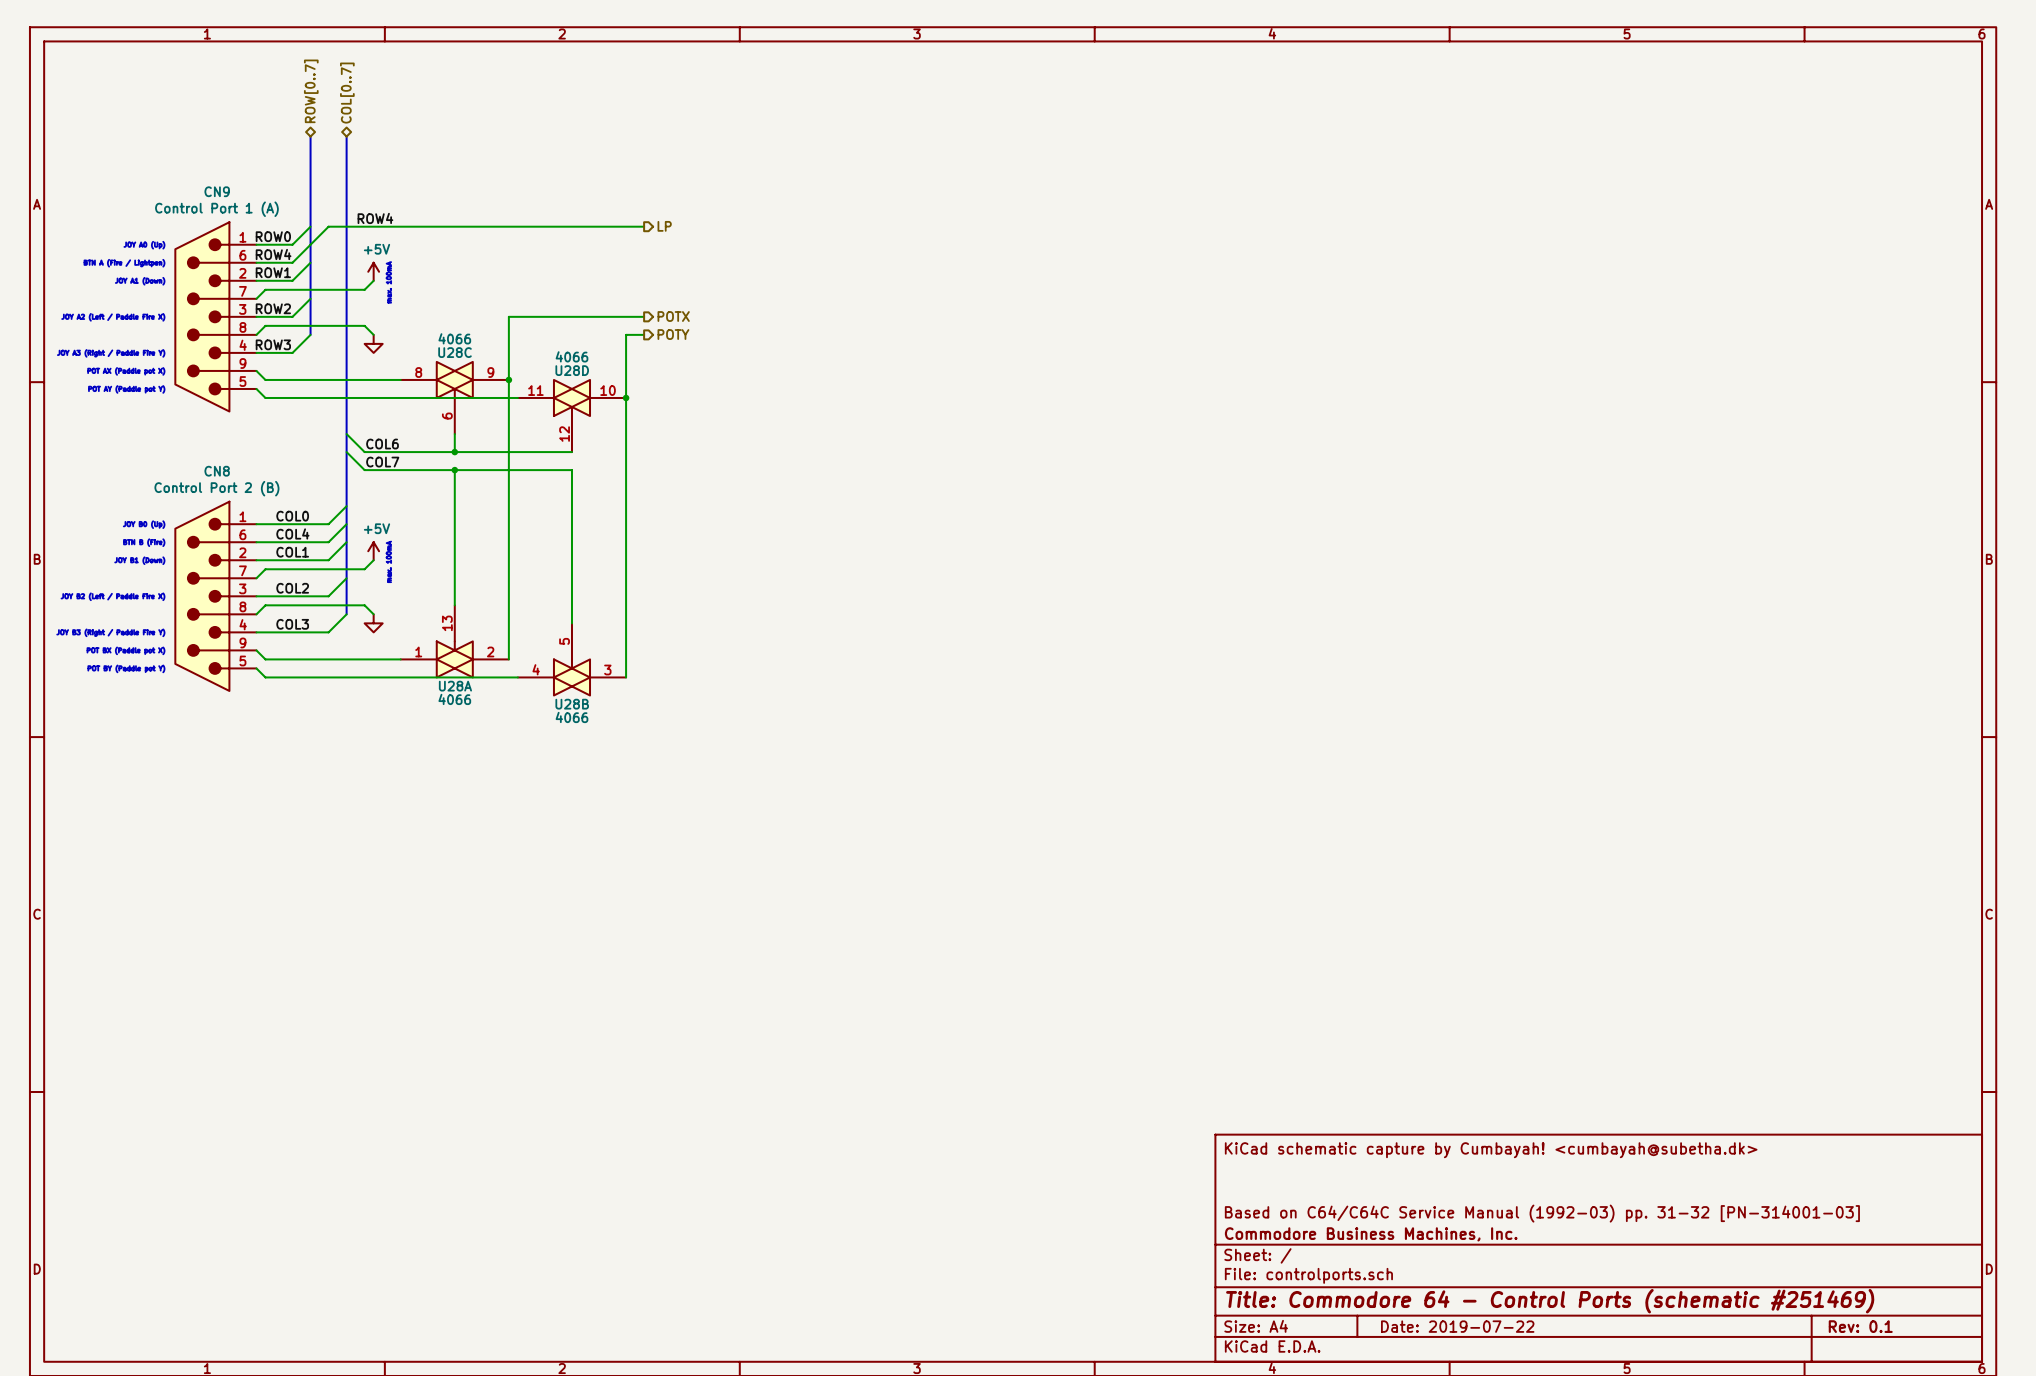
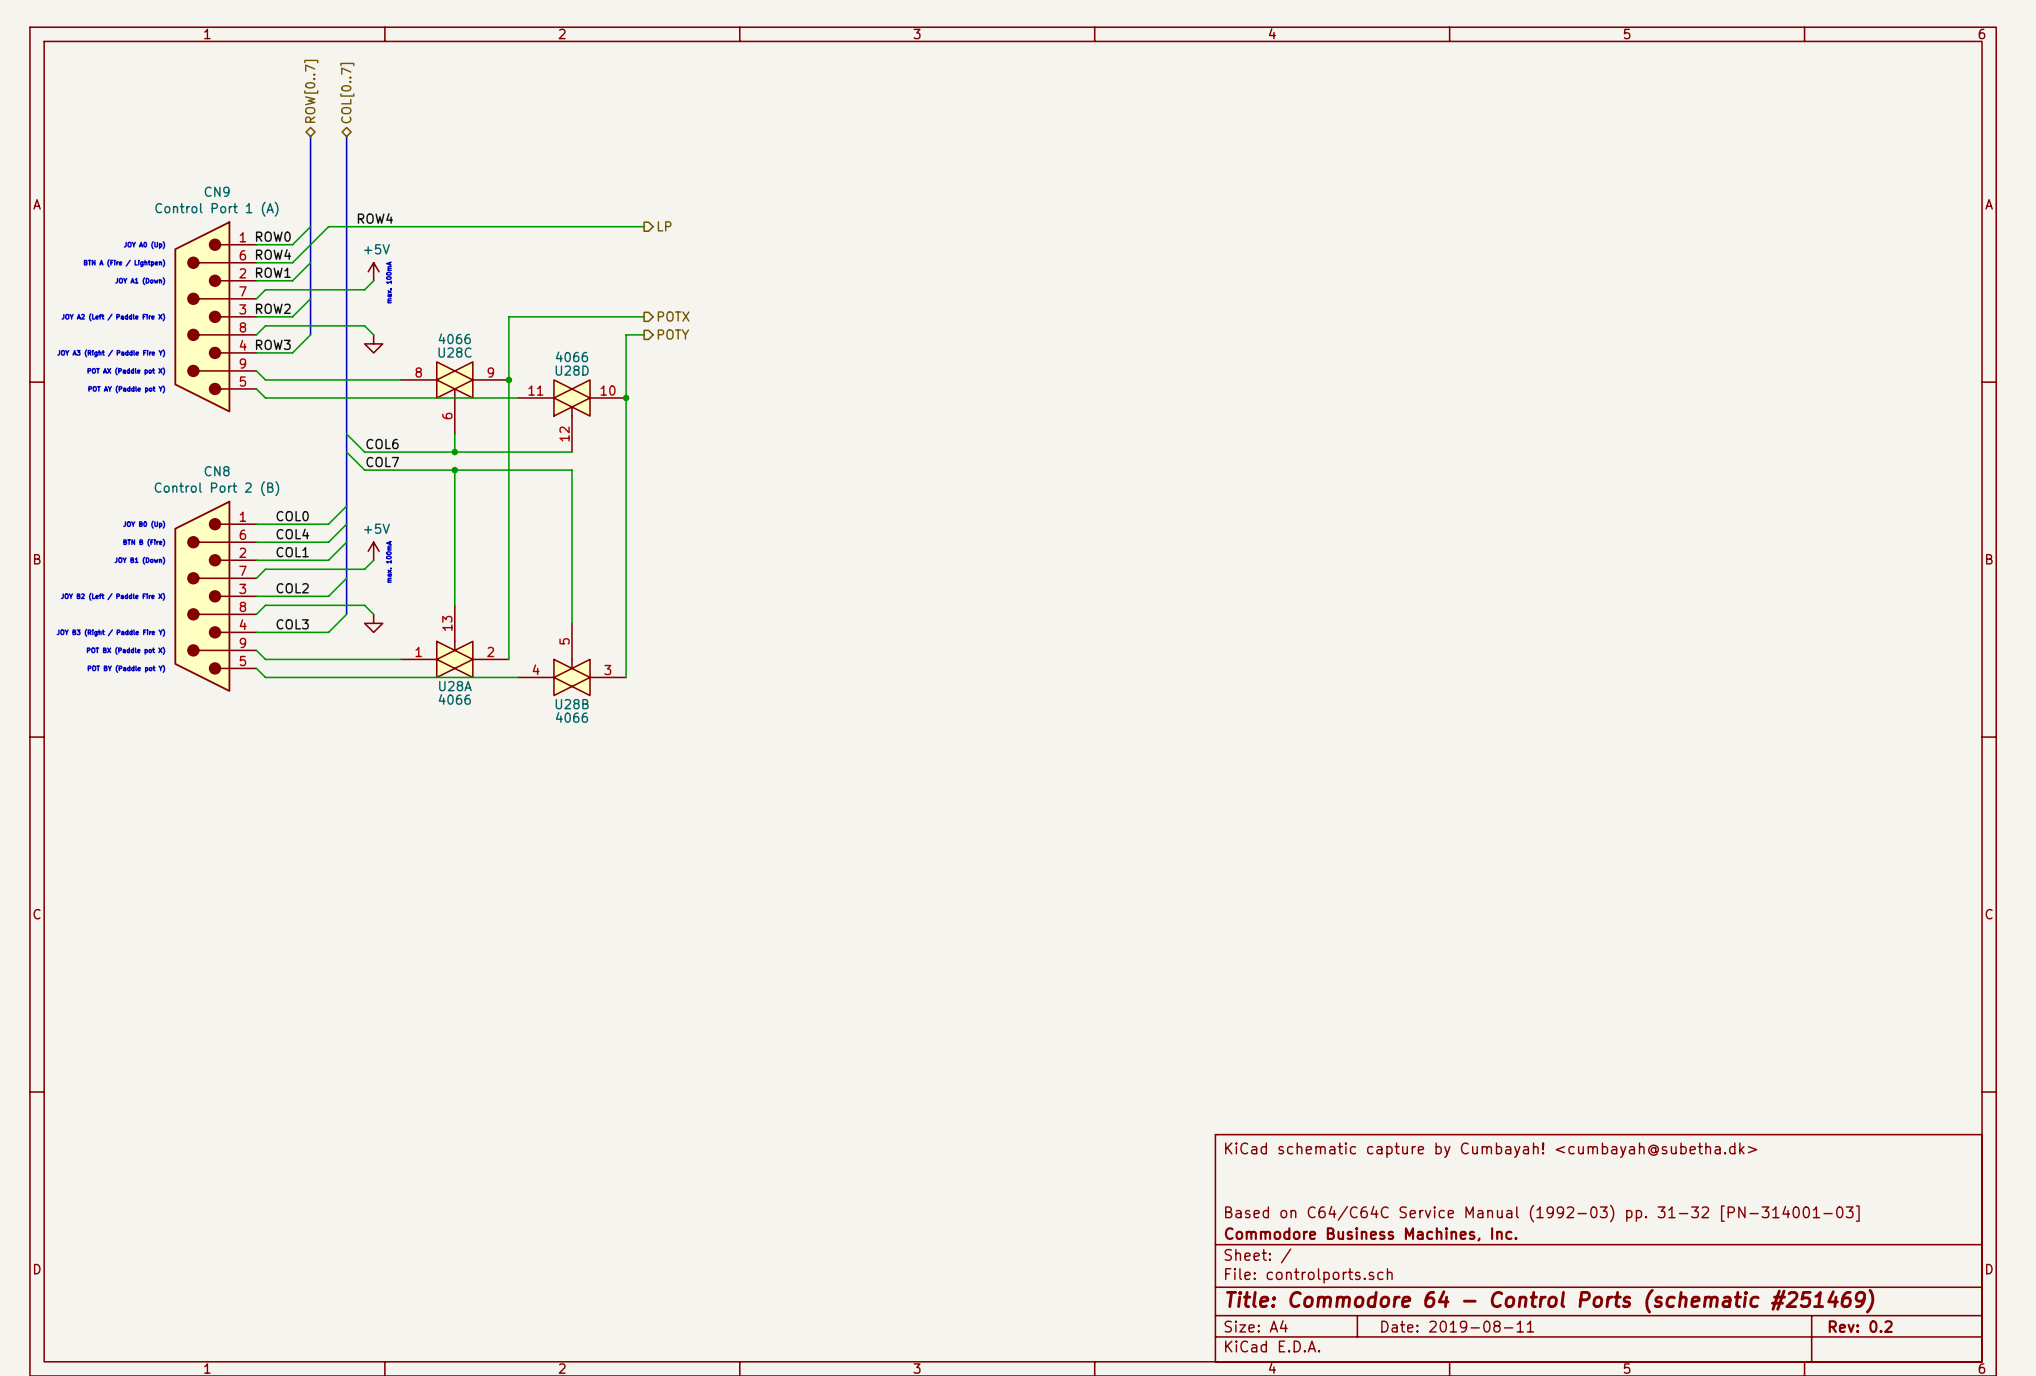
title block: Date: 2019-07-22 (1457, 1326) -> Date: 2019-08-11 (1457, 1326)
title block: Rev: 0.1 (1860, 1326) -> Rev: 0.2 (1860, 1326)

